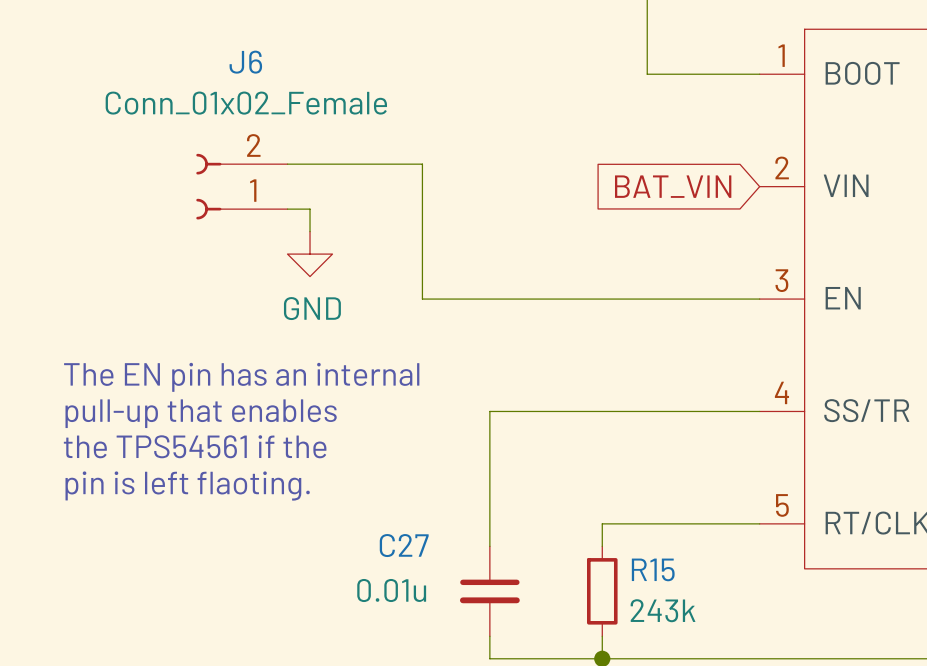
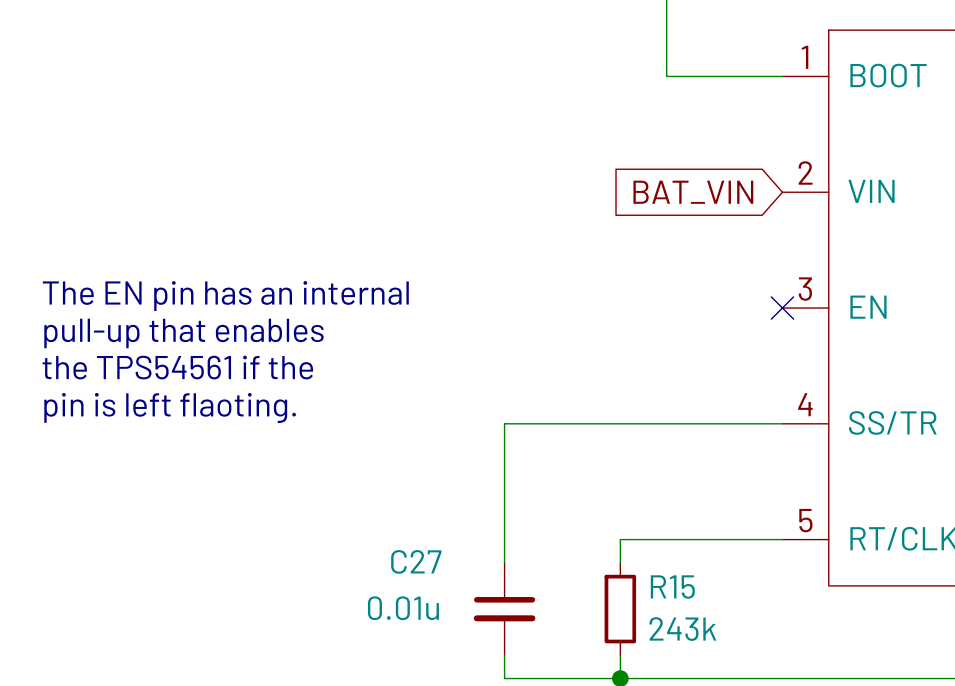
wire: (287, 164) (422, 164) (422, 299) (759, 299) -> none
J6: Conn_01x02_Female (241, 186) -> none
wire: (287, 209) (310, 209) (310, 231) -> none
power symbol: GND (310, 254) -> none
no-connect mark: none -> (782, 308)
text position: The EN pin has an internal (241, 377) -> The EN pin has an internal (225, 296)
text position: pull-up that enables (201, 413) -> pull-up that enables (183, 333)
text position: the TPS54561 if the (195, 446) -> the TPS54561 if the (177, 367)
text position: pin is left flaoting. (187, 486) -> pin is left flaoting. (170, 407)

